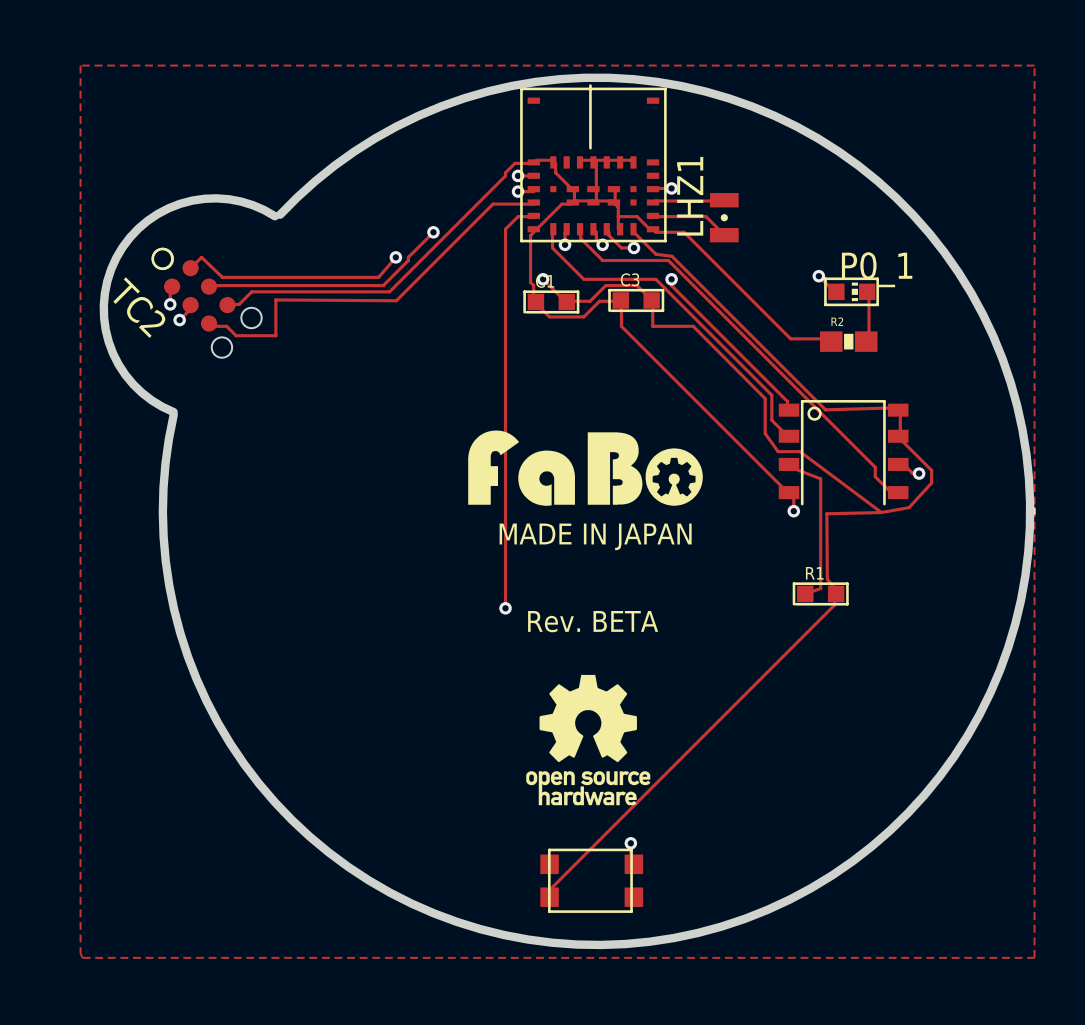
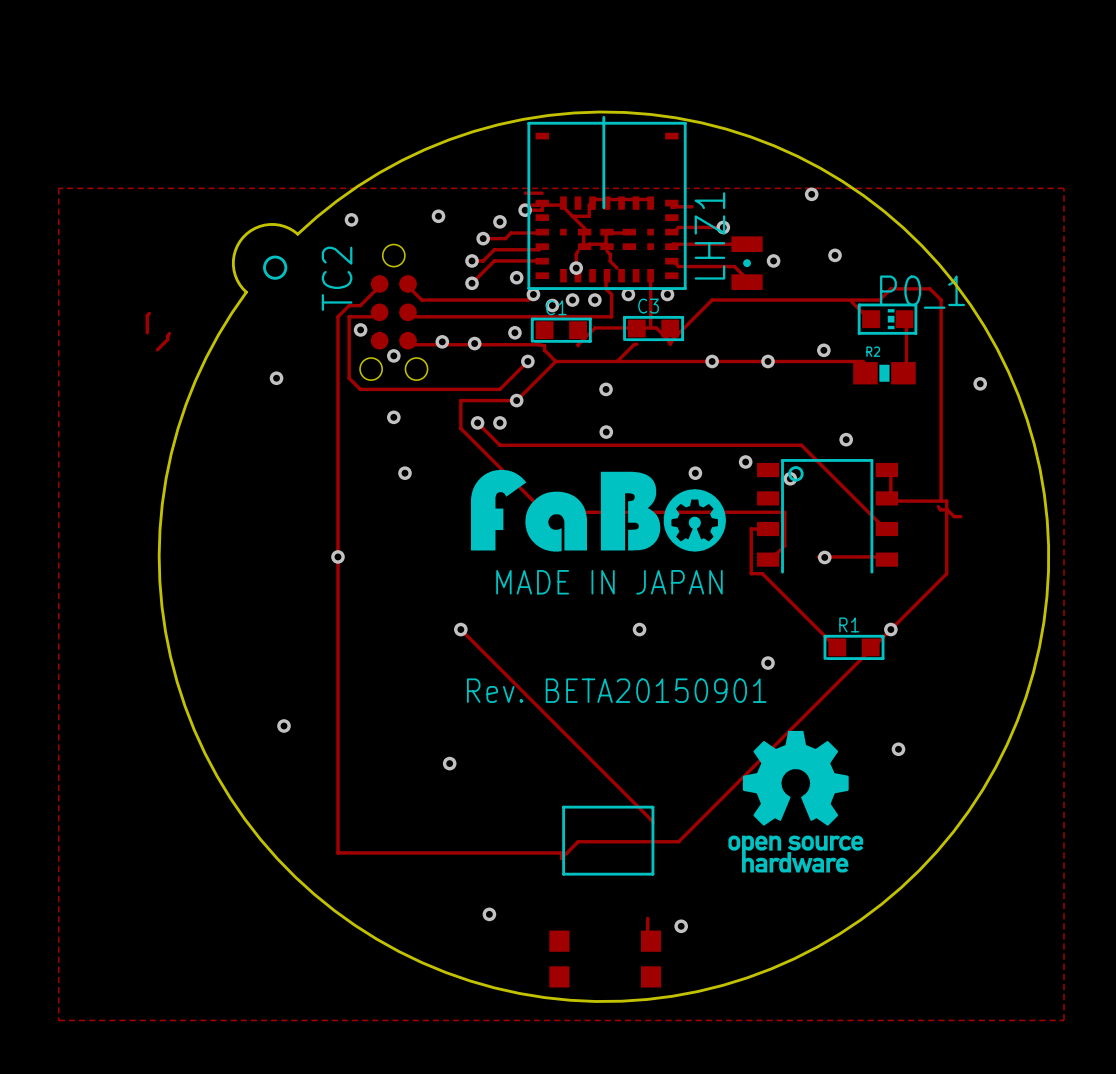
zone outline: (80, 65) (1034, 65) (1034, 957) (82, 957) (80, 953) (80, 65) -> (58, 188) (58, 1020) (1063, 1020) (1063, 188) (58, 188)
track: (580, 162) (580, 160) (593, 160) (593, 162) -> none
track: (593, 162) (596, 160) (605, 160) (606, 162) (608, 160) (618, 160) (620, 162) (621, 160) (630, 160) (633, 162) -> none
track: (593, 162) (596, 163) (596, 188) (593, 189) (596, 191) (596, 200) -> none
part position: (593, 164) -> (607, 205)
via: (518, 175) -> none
via: none -> (811, 194)
track: none -> (650, 203) (650, 199) (594, 199) (589, 205) (589, 216) (572, 216)
track: none -> (522, 205) (539, 205) (542, 203) (544, 205) (561, 205)
track: none -> (561, 205) (589, 233) (583, 233) (584, 246) (589, 244) (606, 244)
via position: (671, 188) -> (723, 227)
track: (613, 189) (613, 202) -> none
via: none -> (438, 216)
via: none -> (351, 219)
track: (574, 200) (593, 200) (593, 202) (596, 200) -> none
track: (574, 200) (574, 191) (555, 172) (555, 163) (552, 160) (536, 160) (533, 163) (514, 163) (505, 172) (505, 175) (389, 291) (251, 291) (239, 304) (227, 305) -> none
track: (574, 200) (571, 204) (561, 204) (536, 229) (533, 229) (530, 235) (530, 282) (533, 285) (533, 301) (549, 316) (583, 316) (599, 301) (620, 300) (621, 326) (789, 492) (793, 498) (793, 511) -> none
track: (596, 200) (613, 202) -> none
track: (724, 200) (653, 202) -> none
via: none -> (499, 221)
track: (533, 202) (533, 204) (492, 204) (396, 300) (275, 299) (275, 335) (236, 335) (226, 326) (210, 326) (209, 323) -> none
track: (613, 202) (618, 207) (618, 229) (620, 229) -> none
track: none -> (723, 227) (678, 227) (671, 232)
track: none -> (542, 232) (511, 233) (505, 238) (483, 238)
track: none -> (628, 233) (607, 232) (606, 244)
track: (533, 215) (518, 216) (505, 229) (505, 608) -> none
track: (653, 215) (706, 216) (724, 235) -> none
track: (618, 216) (637, 216) (649, 229) (652, 229) -> none
via: none -> (483, 238)
LHZ1 position: (724, 217) -> (747, 263)
track: none -> (747, 244) (673, 244) (671, 246)
track: none -> (542, 246) (539, 249) (494, 249) (483, 260) (472, 260)
track: (553, 229) (552, 247) (583, 279) (655, 279) (771, 395) (771, 420) (789, 436) -> none
track: (580, 229) (580, 238) (602, 260) (668, 260) (875, 467) (875, 476) (890, 492) (898, 492) -> none
track: (606, 229) (608, 235) (621, 247) (633, 247) -> none
track: (633, 229) (633, 232) (655, 254) (671, 256) (825, 409) (897, 407) (900, 410) (900, 435) (898, 436) (931, 470) (931, 482) (909, 507) (881, 512) -> none
track: (653, 229) (655, 232) (684, 232) (790, 338) (828, 338) (831, 341) -> none
track: (433, 232) (383, 285) (209, 286) -> none
via: (433, 232) -> none
via: none -> (835, 255)
via: none -> (472, 260)
track: none -> (542, 261) (494, 260) (472, 283)
track: none -> (671, 261) (678, 266) (734, 266) (745, 277) (747, 282)
via: none -> (773, 260)
via: (602, 244) -> none
via: (633, 247) -> none
track: none -> (607, 275) (606, 288) (611, 294) (611, 316) (410, 316) (408, 312)
track: none -> (650, 275) (650, 327)
via: none -> (516, 277)
track: (395, 257) (378, 277) (222, 277) (201, 257) (190, 268) -> none
via: (395, 257) -> none
via: none -> (472, 283)
track: none -> (379, 283) (360, 305) (349, 305) (337, 316) (337, 852) (561, 852) (561, 858) (578, 841) (678, 841) (868, 651) (870, 647) (874, 646) (946, 573) (946, 501) (890, 501) (886, 498) (890, 495) (890, 473) (886, 470)
track: none -> (408, 283) (421, 300) (527, 300) (533, 294)
via: none -> (533, 294)
via: none -> (628, 294)
via: none -> (667, 294)
via: none -> (572, 300)
via: none -> (594, 300)
via: (818, 276) -> none
track: (543, 279) (566, 302) (590, 301) (605, 285) (637, 285) (652, 301) (652, 326) (693, 326) (765, 398) (765, 433) (778, 451) (800, 451) (881, 512) -> none
track: (671, 279) (671, 285) (787, 401) (789, 410) -> none
via: (671, 279) -> none
track: none -> (379, 312) (377, 316) (349, 316) (349, 378) (360, 389) (499, 389) (527, 361)
via: none -> (360, 329)
TC2 rotation: 0° (207, 303) -> 45° clockwise (393, 312)
TC2 position: (207, 303) -> (393, 312)
via: (170, 304) -> none
via: none -> (514, 332)
track: none -> (408, 340) (410, 344) (539, 344) (544, 345) (544, 350) (555, 361)
via: none -> (442, 341)
via: none -> (474, 343)
track: none -> (636, 344) (617, 361)
track: none -> (578, 345) (594, 327) (656, 327) (670, 344) (712, 300) (879, 300) (890, 288) (929, 288) (941, 300) (941, 501)
via: (179, 320) -> none
via: none -> (823, 350)
via: none -> (393, 355)
via: none -> (527, 361)
track: none -> (555, 361) (862, 361) (869, 371)
track: none -> (555, 361) (516, 400) (460, 400) (460, 428) (544, 512) (784, 512) (784, 545) (768, 559)
via: none -> (712, 361)
via: none -> (767, 361)
via: none -> (276, 378)
via: none -> (980, 383)
via: none -> (606, 389)
via: none -> (516, 400)
via: none -> (393, 417)
track: none -> (477, 422) (499, 445) (801, 445) (886, 529)
via: none -> (477, 422)
via: none -> (499, 422)
via: none -> (606, 432)
via: none -> (846, 439)
via: none -> (745, 462)
via: none -> (404, 473)
via: none -> (695, 473)
via: none -> (790, 478)
part position: (843, 452) -> (827, 516)
track: (789, 464) (790, 467) (820, 478) (820, 588) (805, 593) -> (768, 529) (751, 529) (751, 573) (762, 573) (837, 647)
via: (919, 473) -> none
via: none -> (337, 556)
part: none -> (603, 556)
track: none -> (818, 556) (885, 556) (886, 559)
part: (567, 511) -> none
track: (881, 512) (826, 513) (827, 579) (837, 592) (834, 595) (834, 605) (552, 887) (552, 896) (549, 897) -> none
track: none -> (460, 629) (653, 822)
via: none -> (460, 629)
via: none -> (639, 629)
via: none -> (890, 629)
via: (505, 608) -> none
via: none -> (767, 663)
text: Rev. BETA (593, 621) -> Rev. BETA20150901 (616, 690)
via: none -> (284, 725)
via: none -> (898, 749)
via: none -> (449, 763)
drawing position: (588, 740) -> (795, 801)
via: none -> (489, 914)
via position: (630, 843) -> (681, 926)

